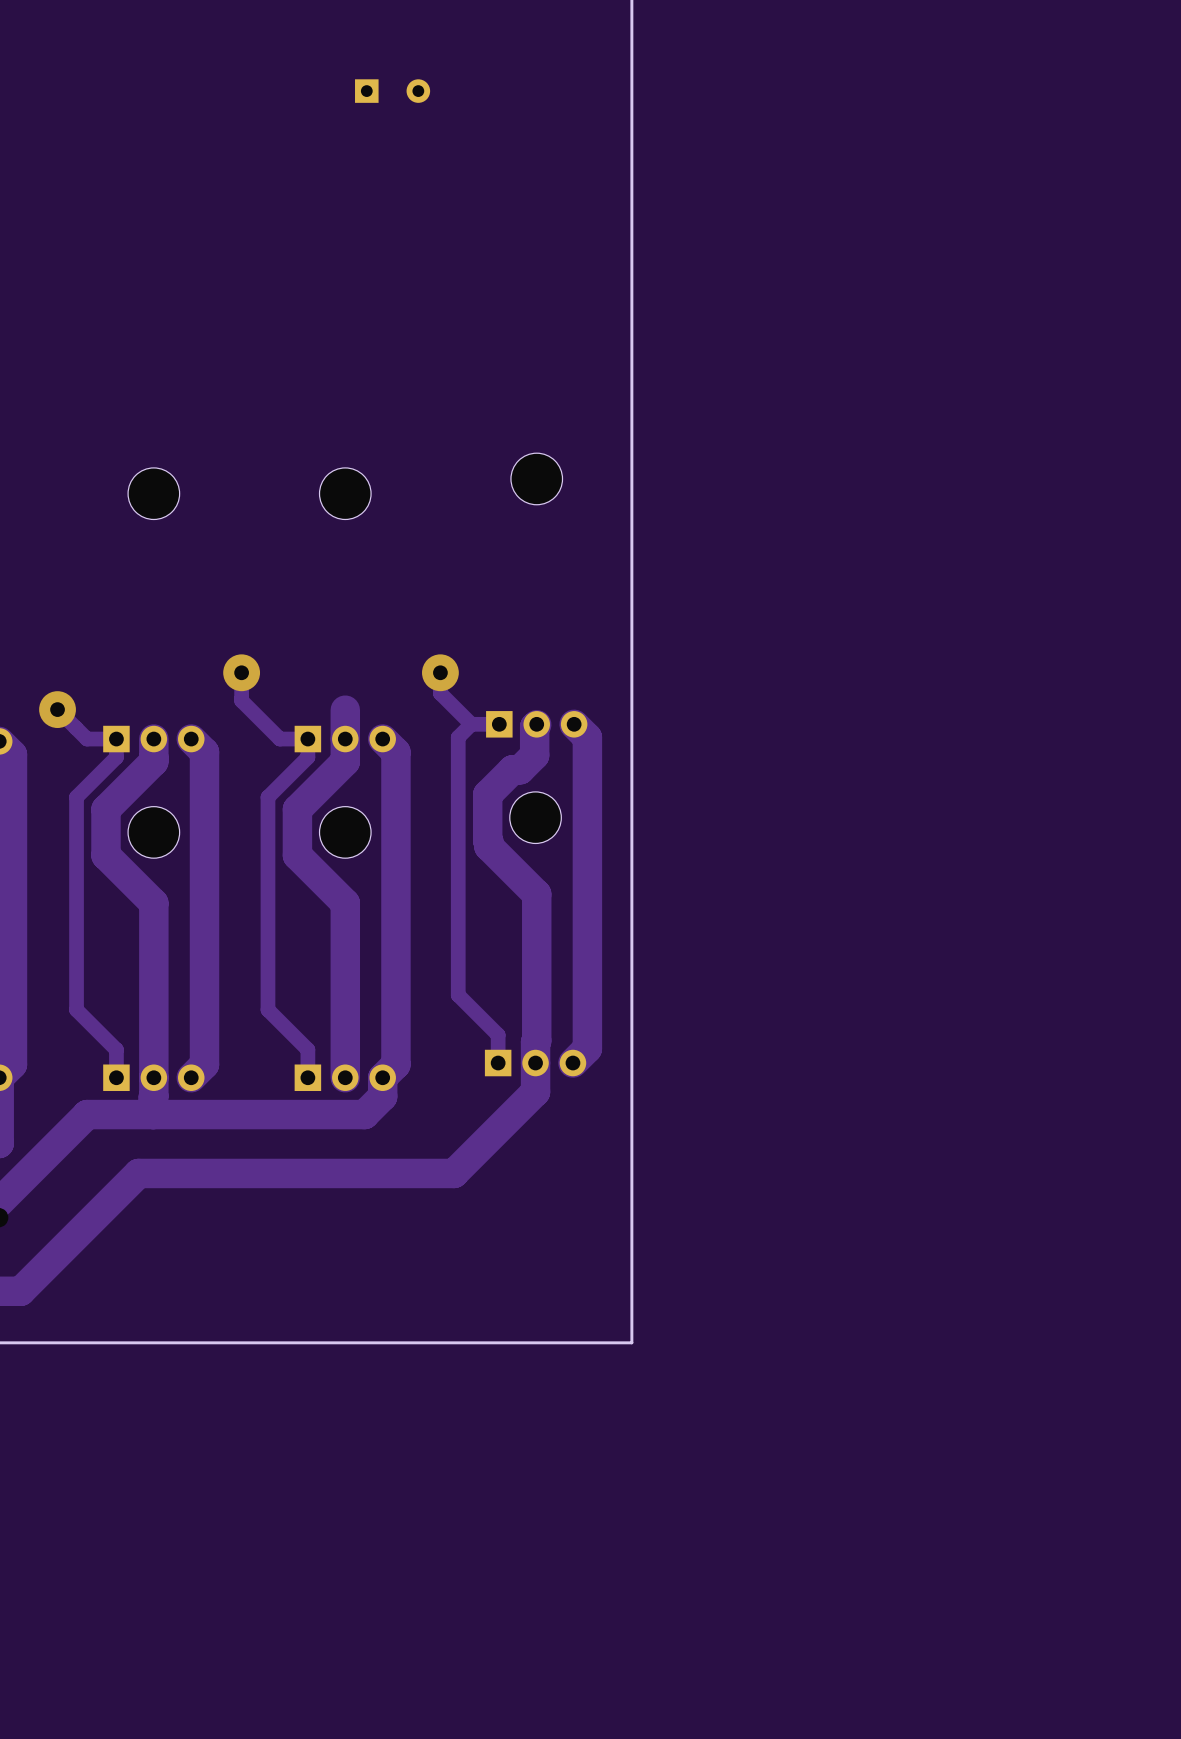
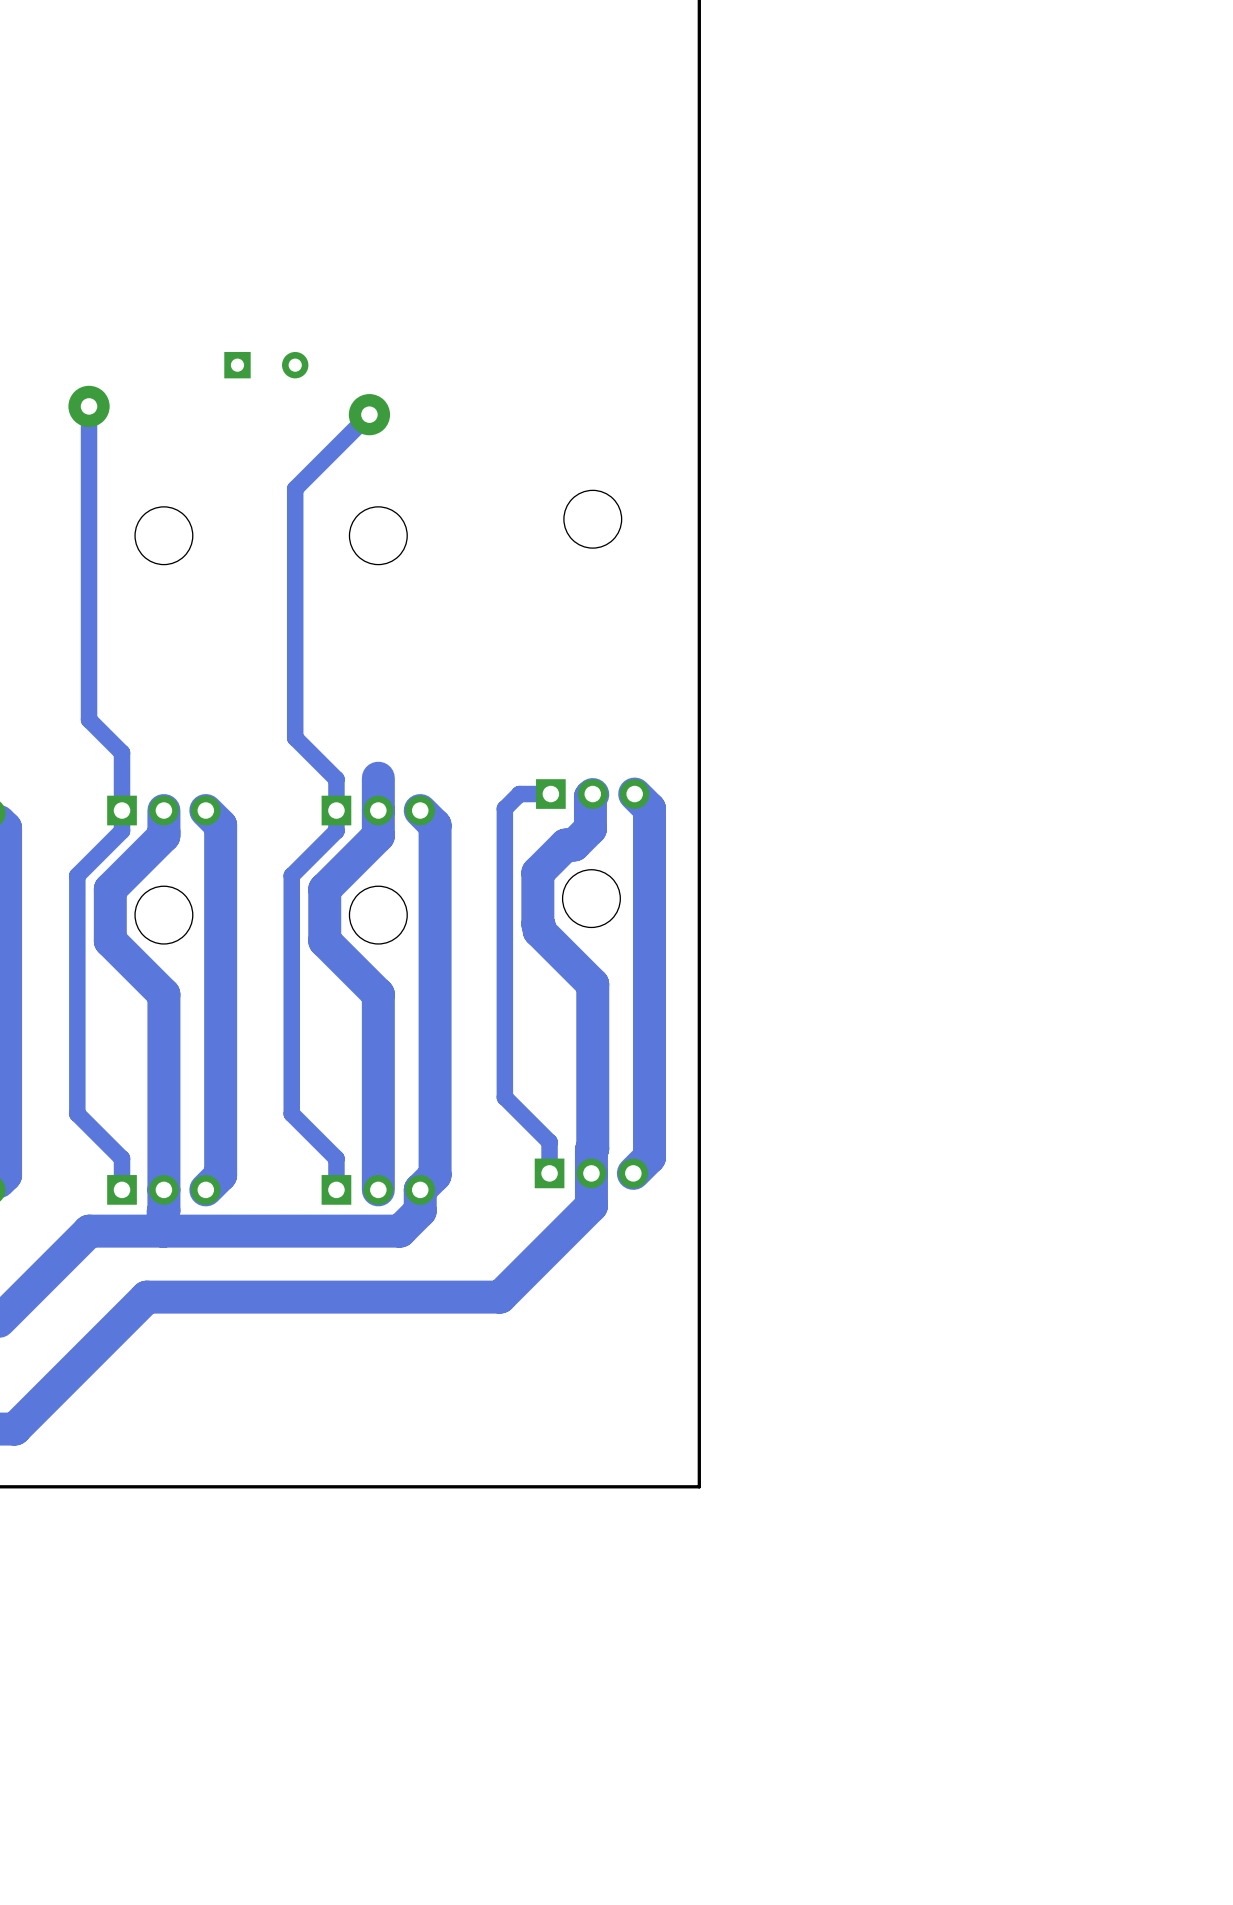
part position: (392, 91) -> (266, 365)
via: none -> (89, 406)
via: none -> (369, 414)
track: (241, 672) (241, 700) (279, 739) (307, 739) -> (369, 414) (295, 488) (295, 737) (336, 779) (336, 810)
via: (241, 672) -> none
track: (440, 672) (440, 693) (471, 724) -> none
via: (440, 672) -> none
track: (57, 709) (86, 739) (116, 739) -> (89, 406) (89, 719) (122, 752) (122, 810)
via: (57, 709) -> none

